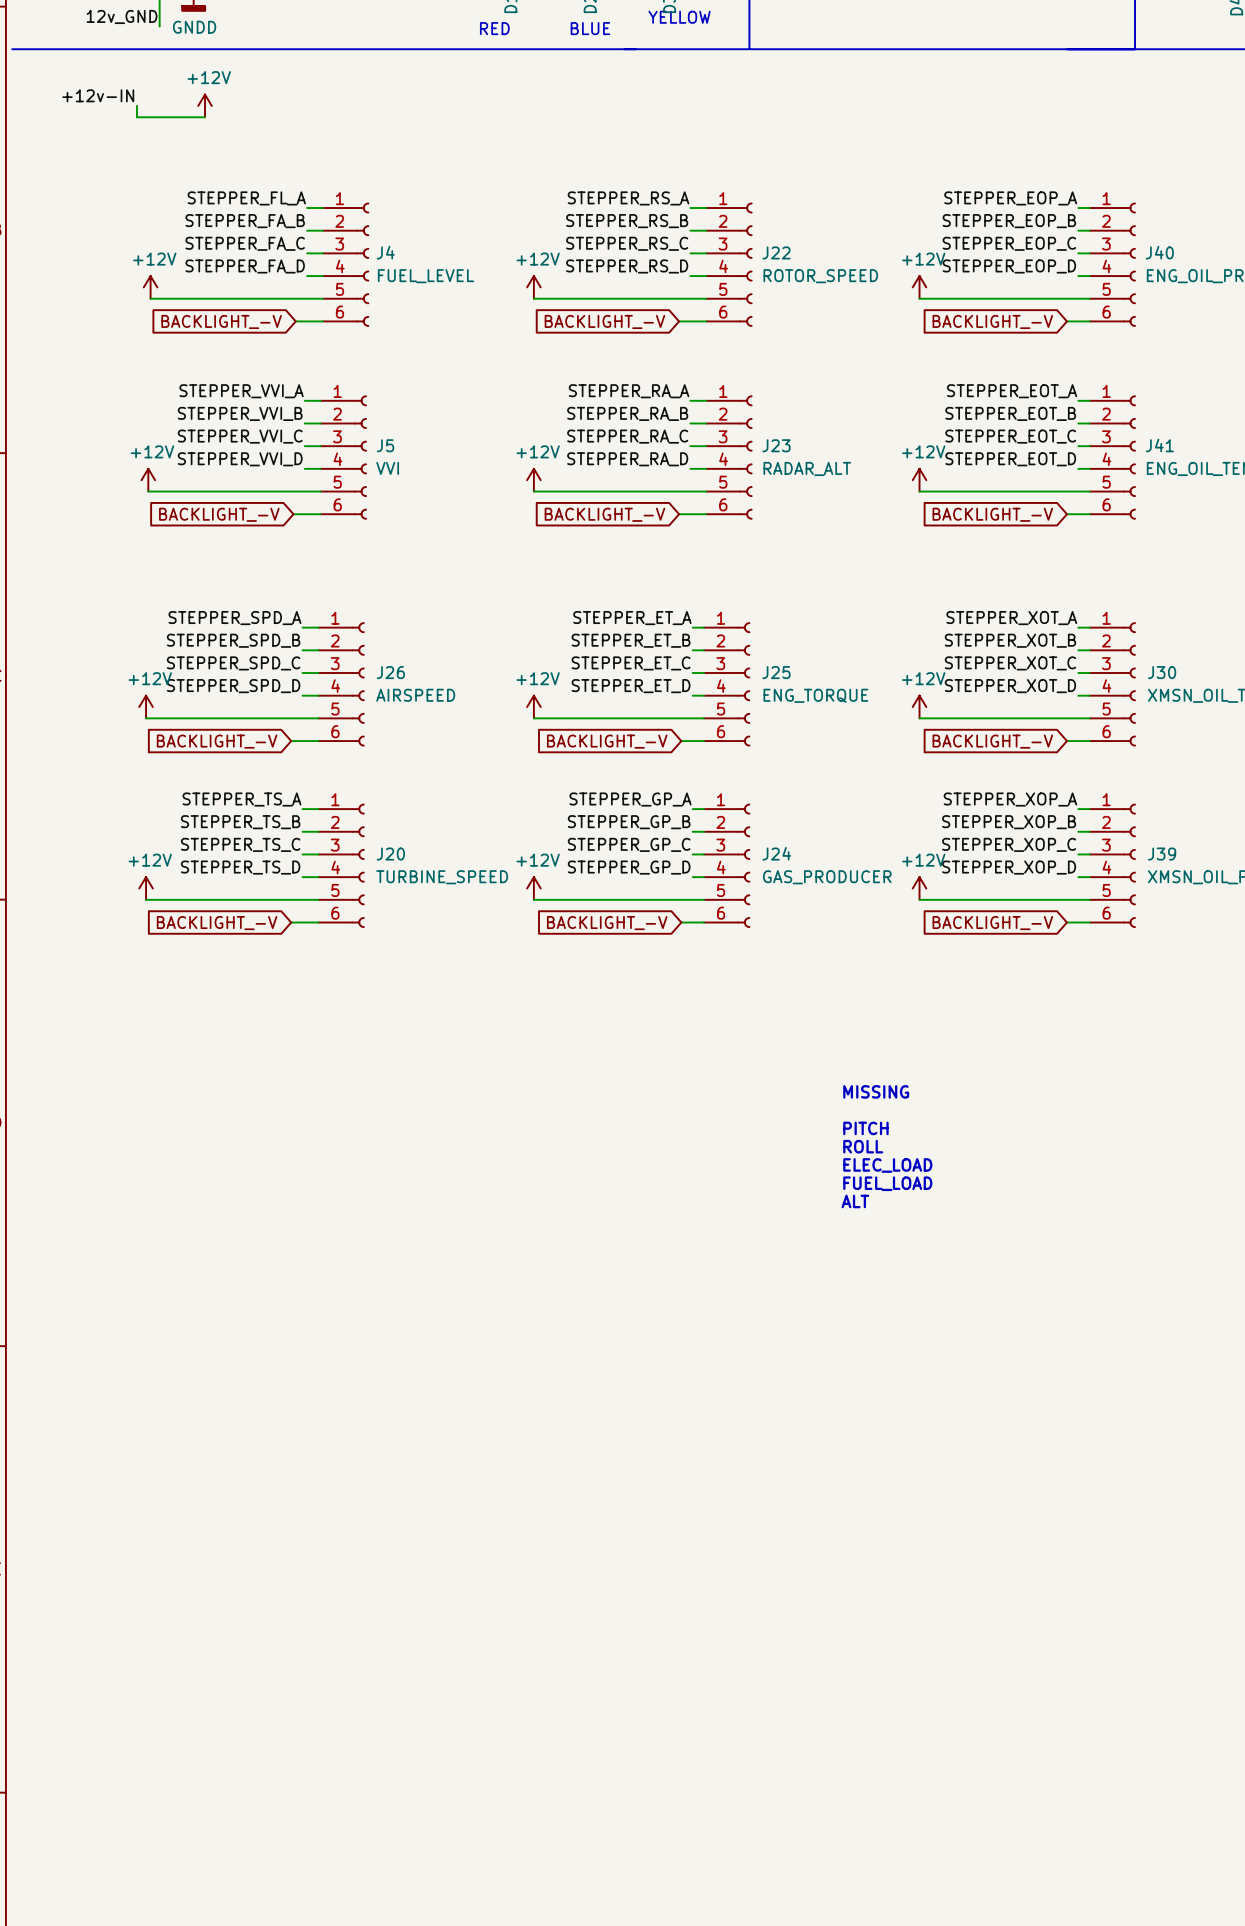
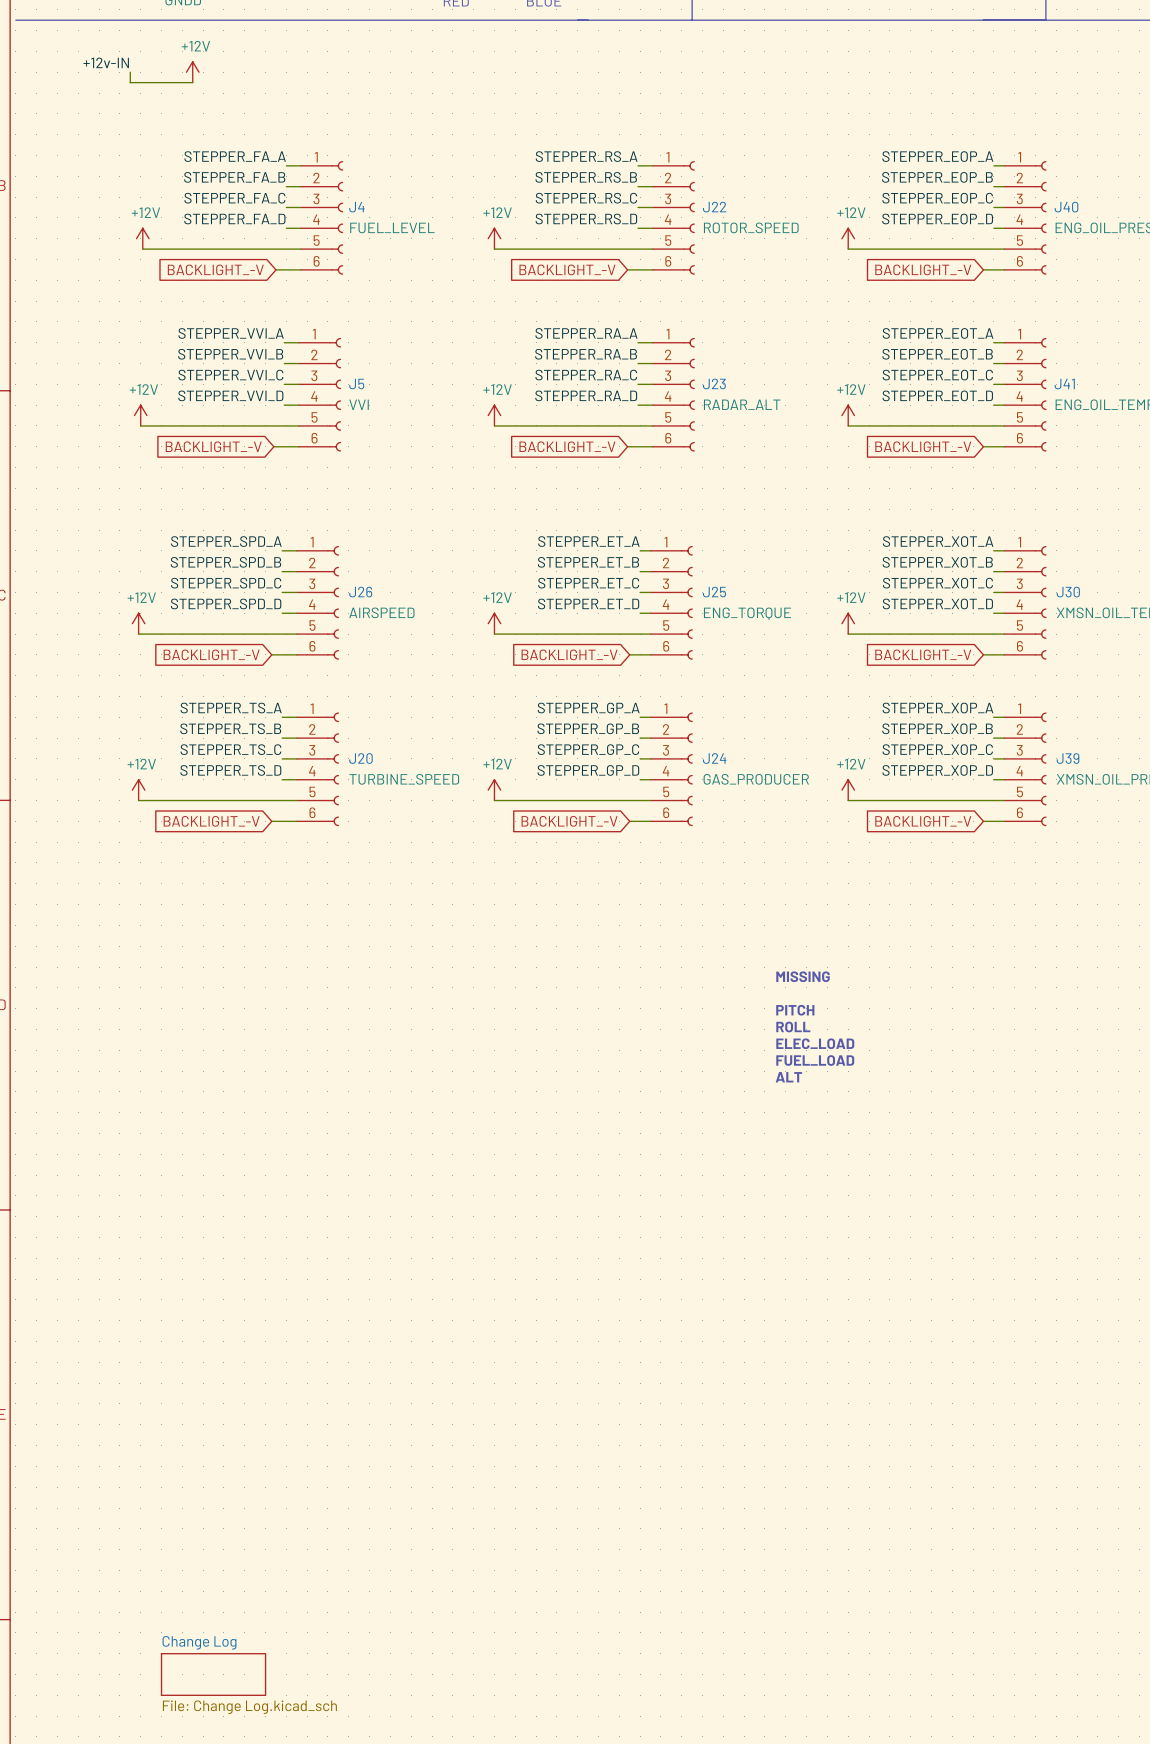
label: STEPPER_FL_A (246, 198) -> STEPPER_FA_A (235, 156)
sheet Change Log: none -> File: Change Log.kicad_sch (213, 1674)

